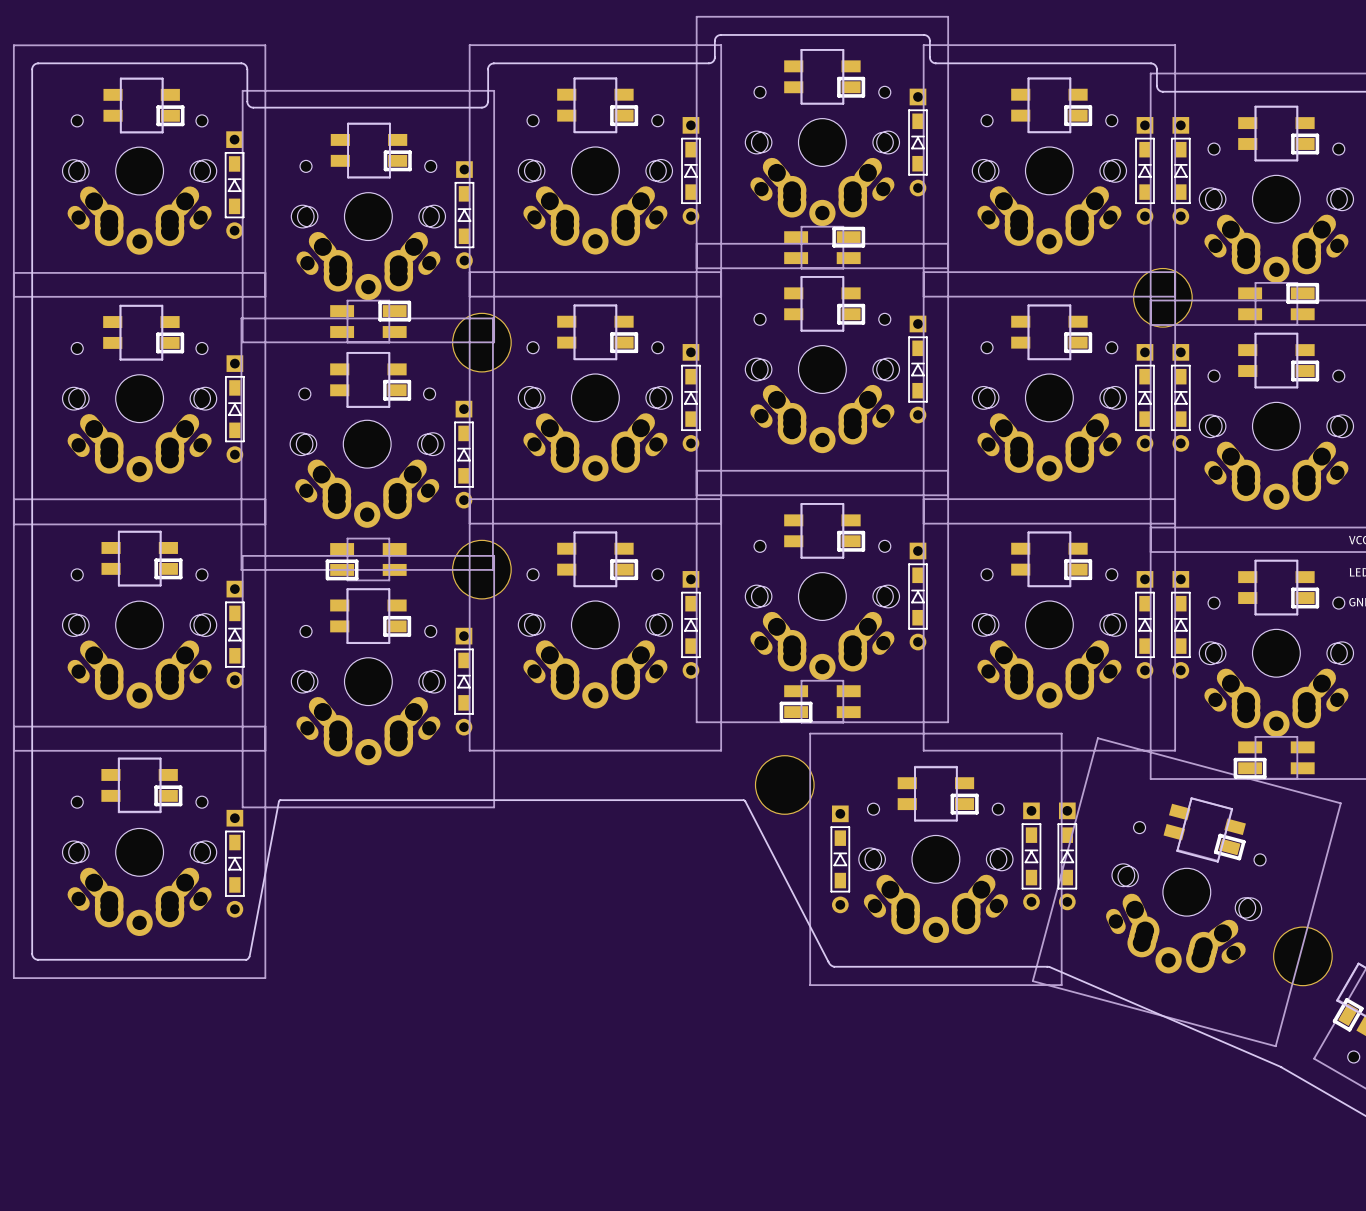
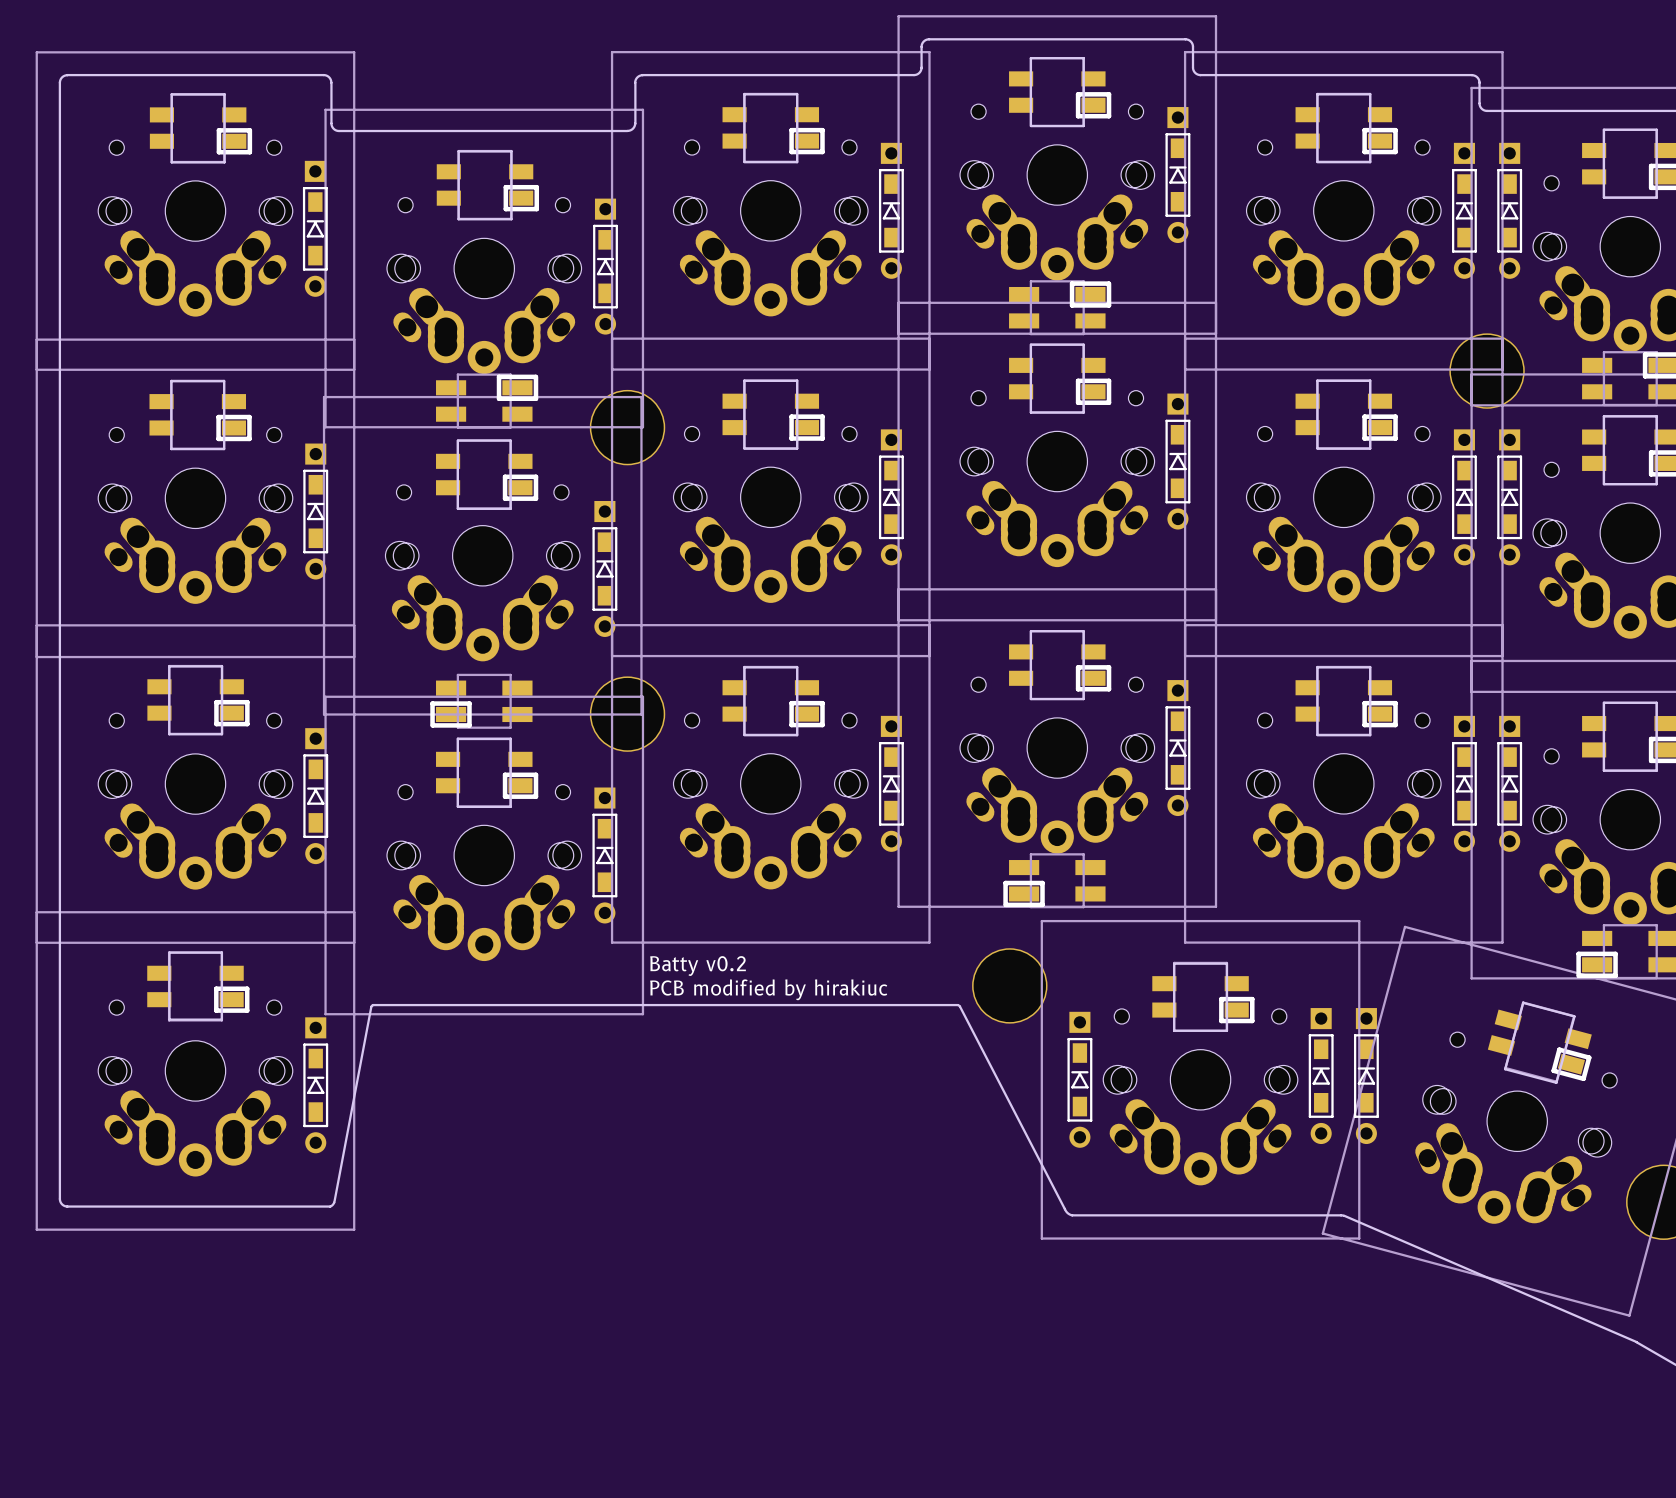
text: none -> Batty v0.2 (698, 966)
text: none -> PCB modified by hirakiuc (768, 989)

